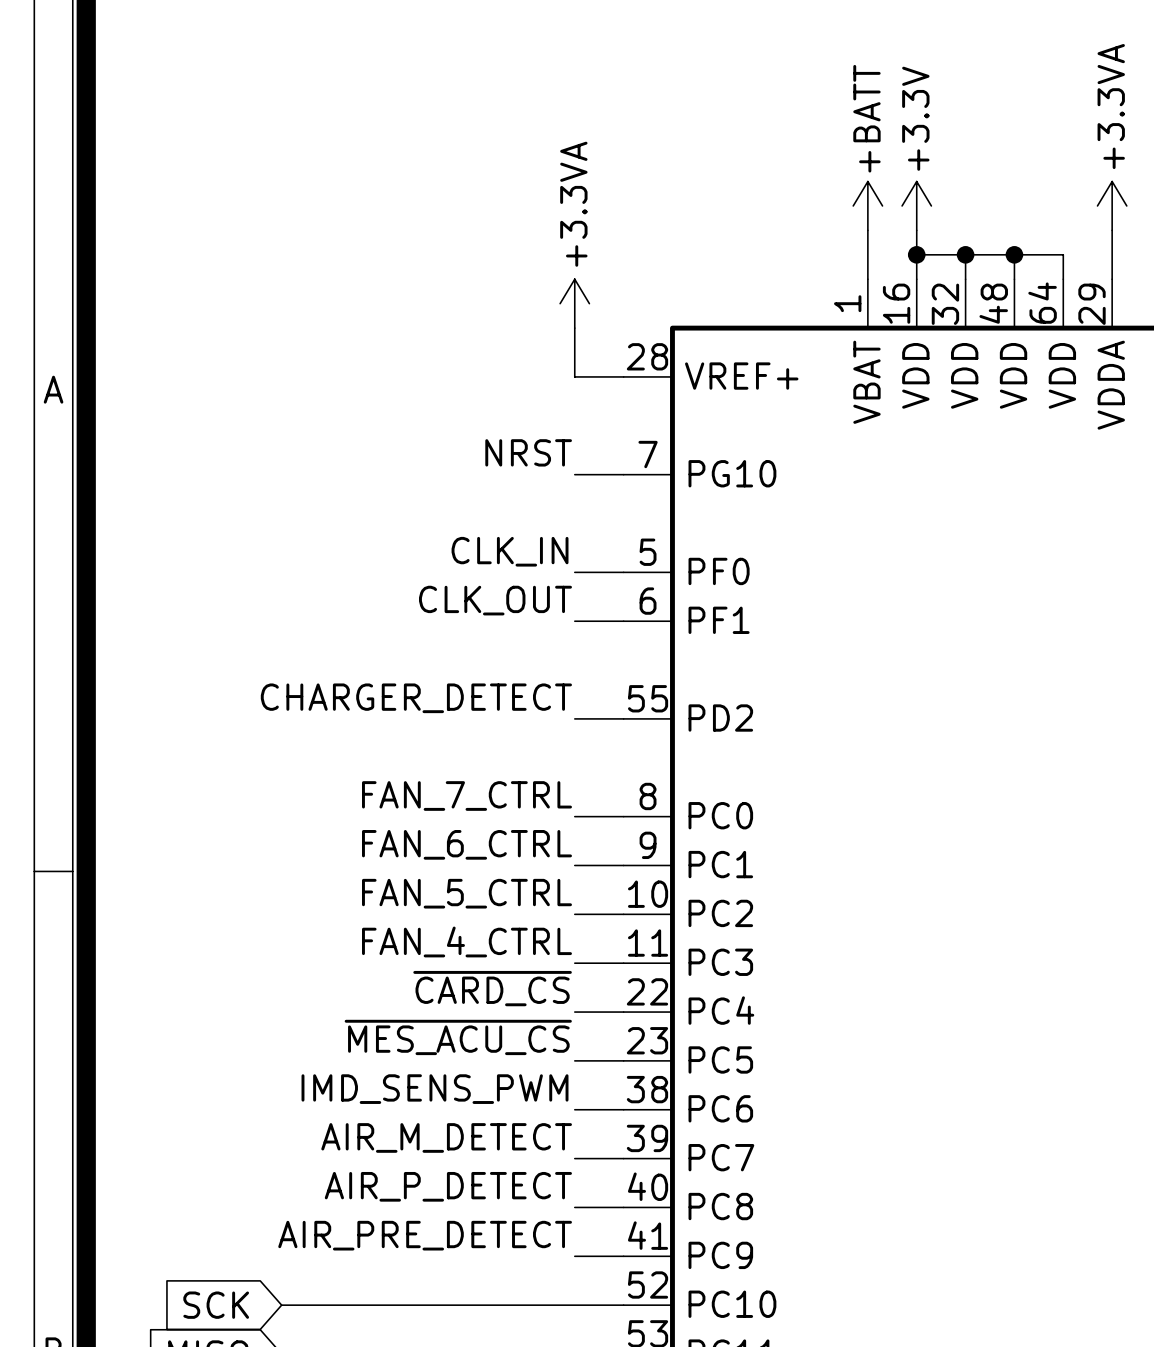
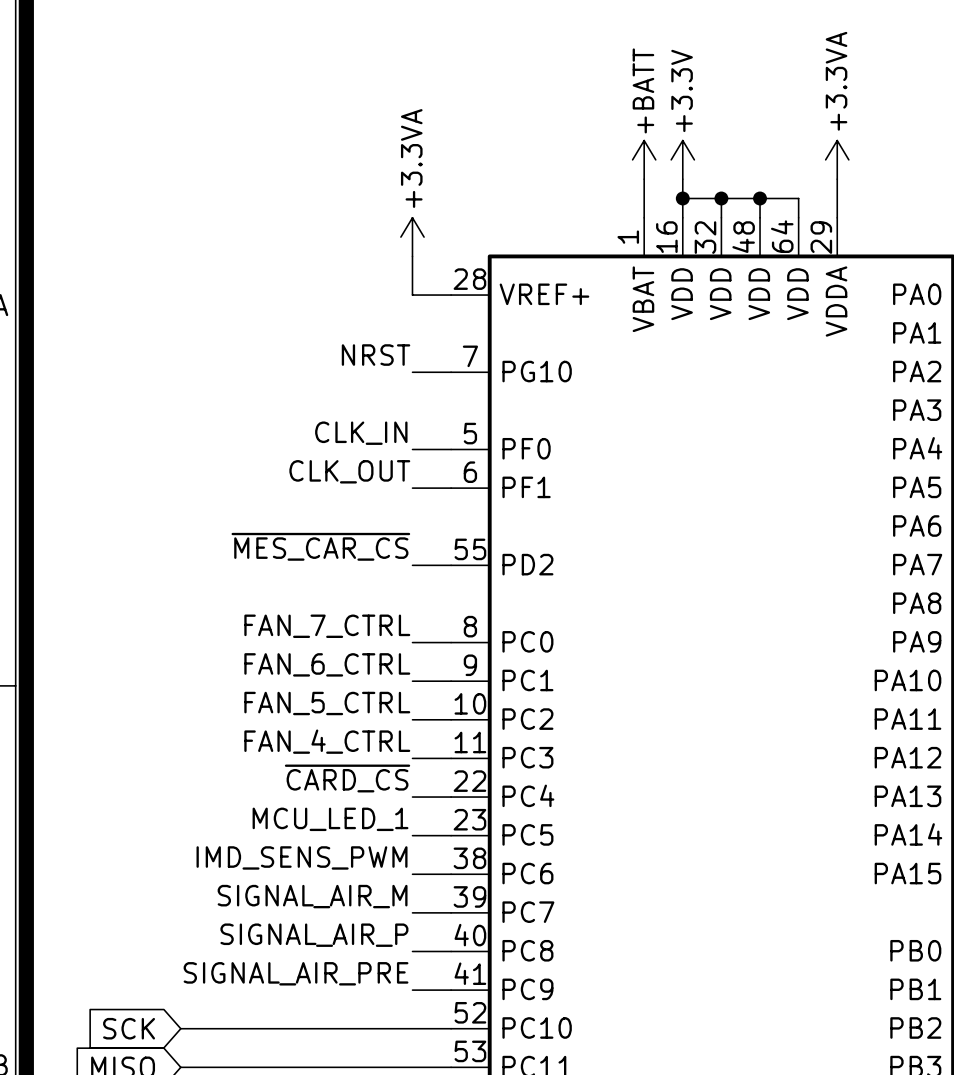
label: CHARGER_DETECT (416, 698) -> ~{MES_CAR_CS} (320, 546)
label: ~{MES_ACU_CS} (458, 1037) -> MCU_LED_1 (330, 819)
label: AIR_M_DETECT (446, 1137) -> SIGNAL_AIR_M (312, 896)
label: AIR_P_DETECT (448, 1186) -> SIGNAL_AIR_P (314, 935)
label: AIR_PRE_DETECT (425, 1235) -> SIGNAL_AIR_PRE (296, 973)

